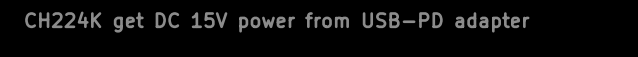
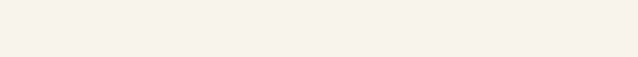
text: CH224K get DC 15V power from USB-PD adapter (277, 22) -> none

